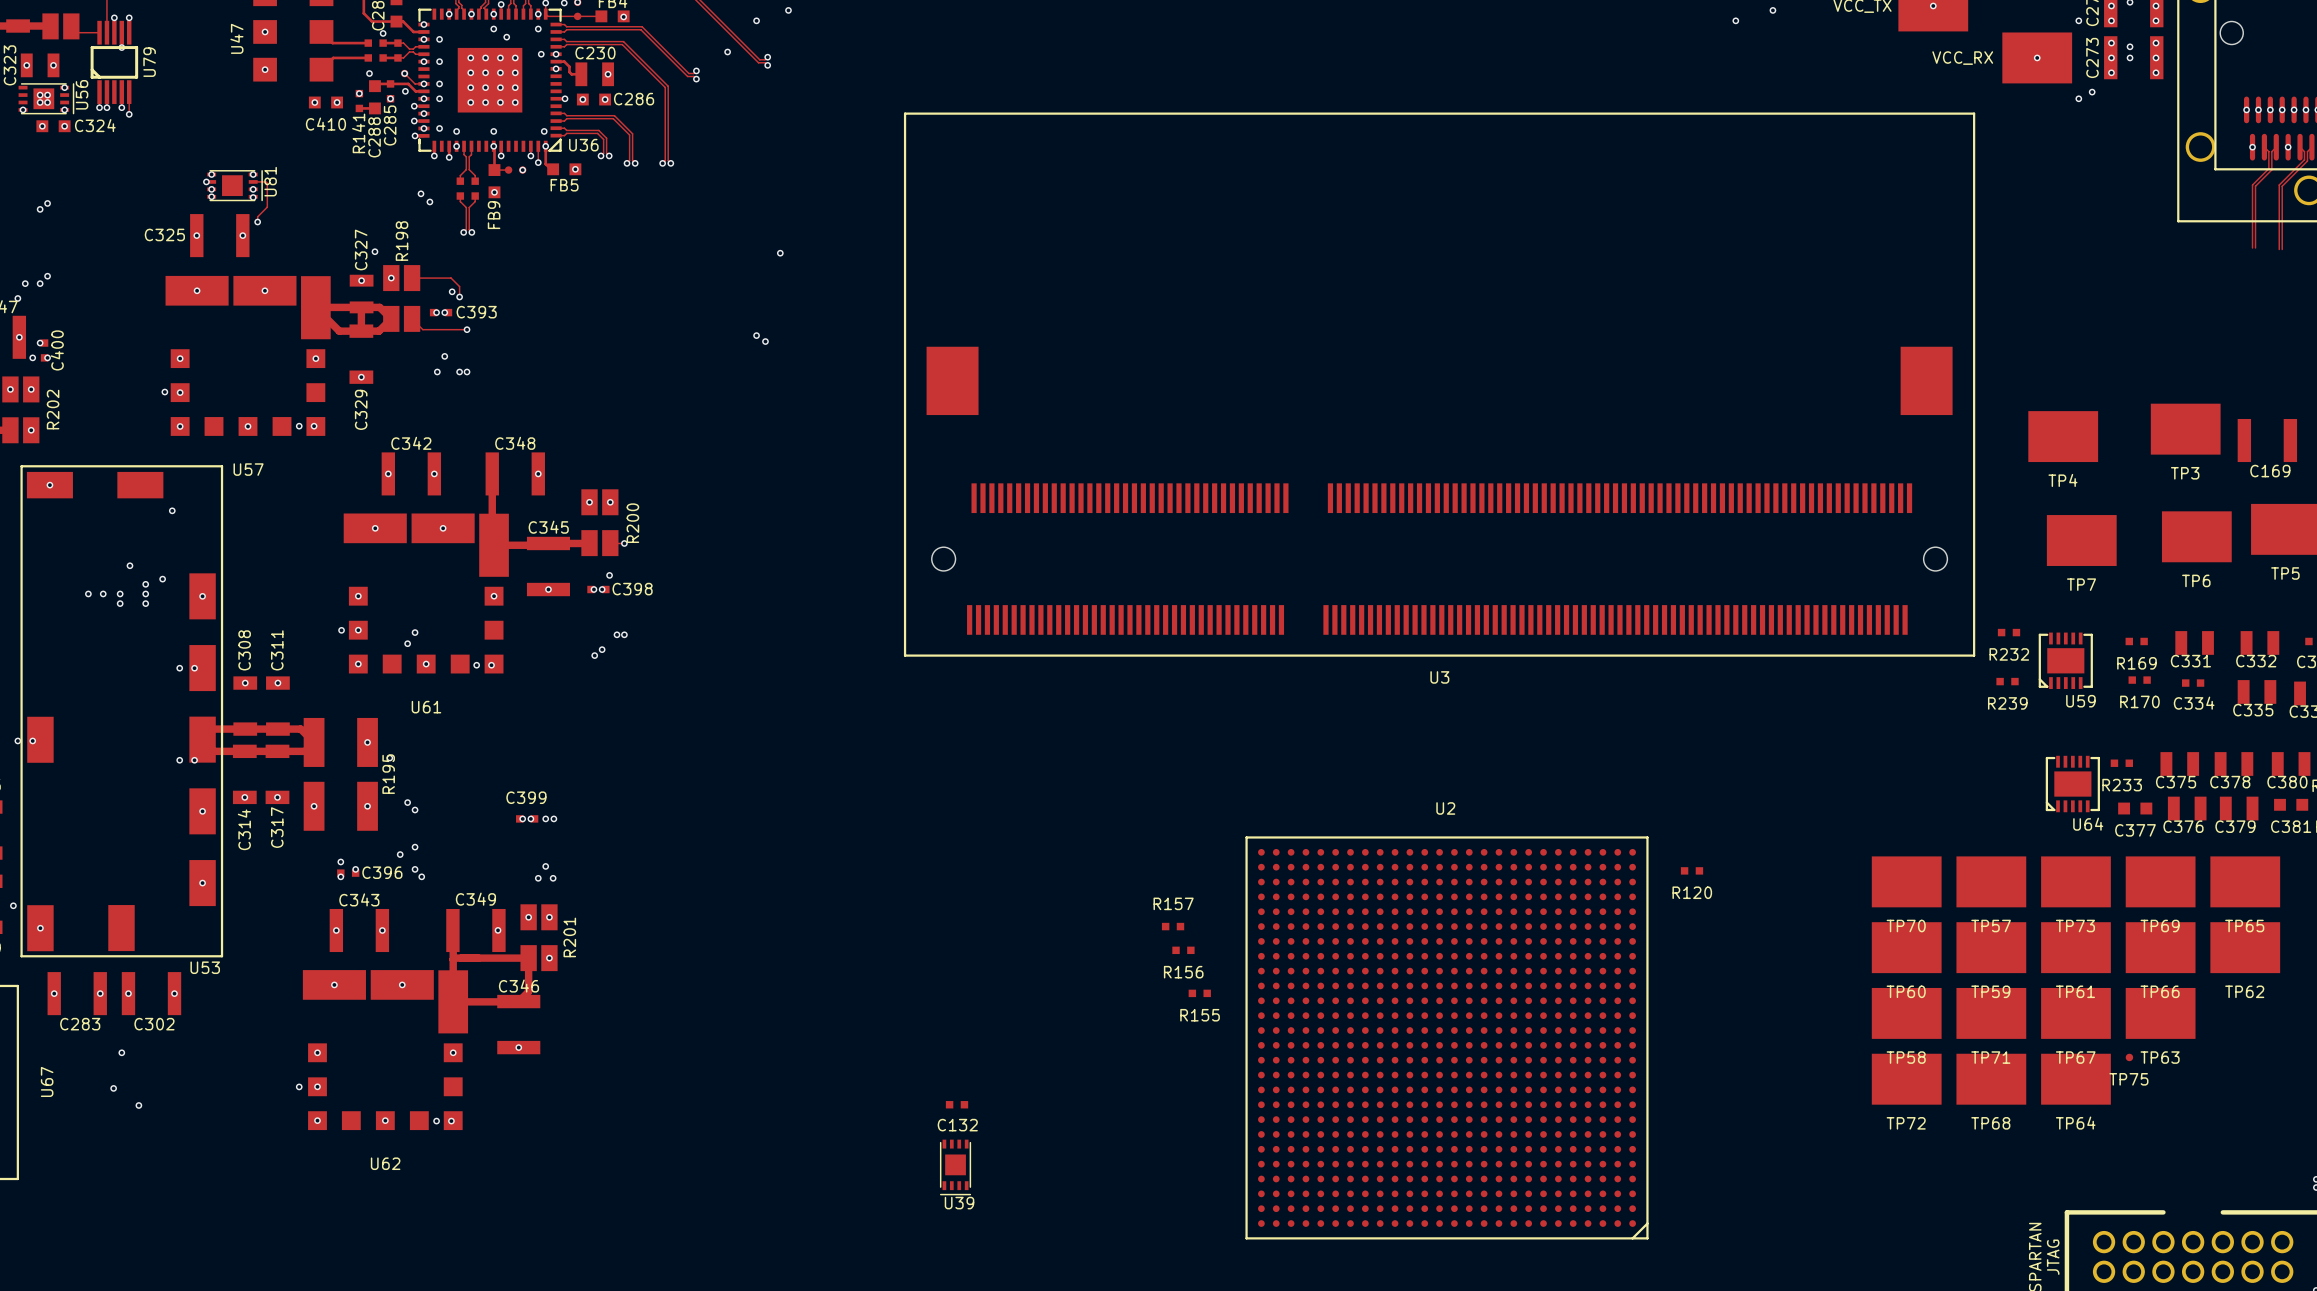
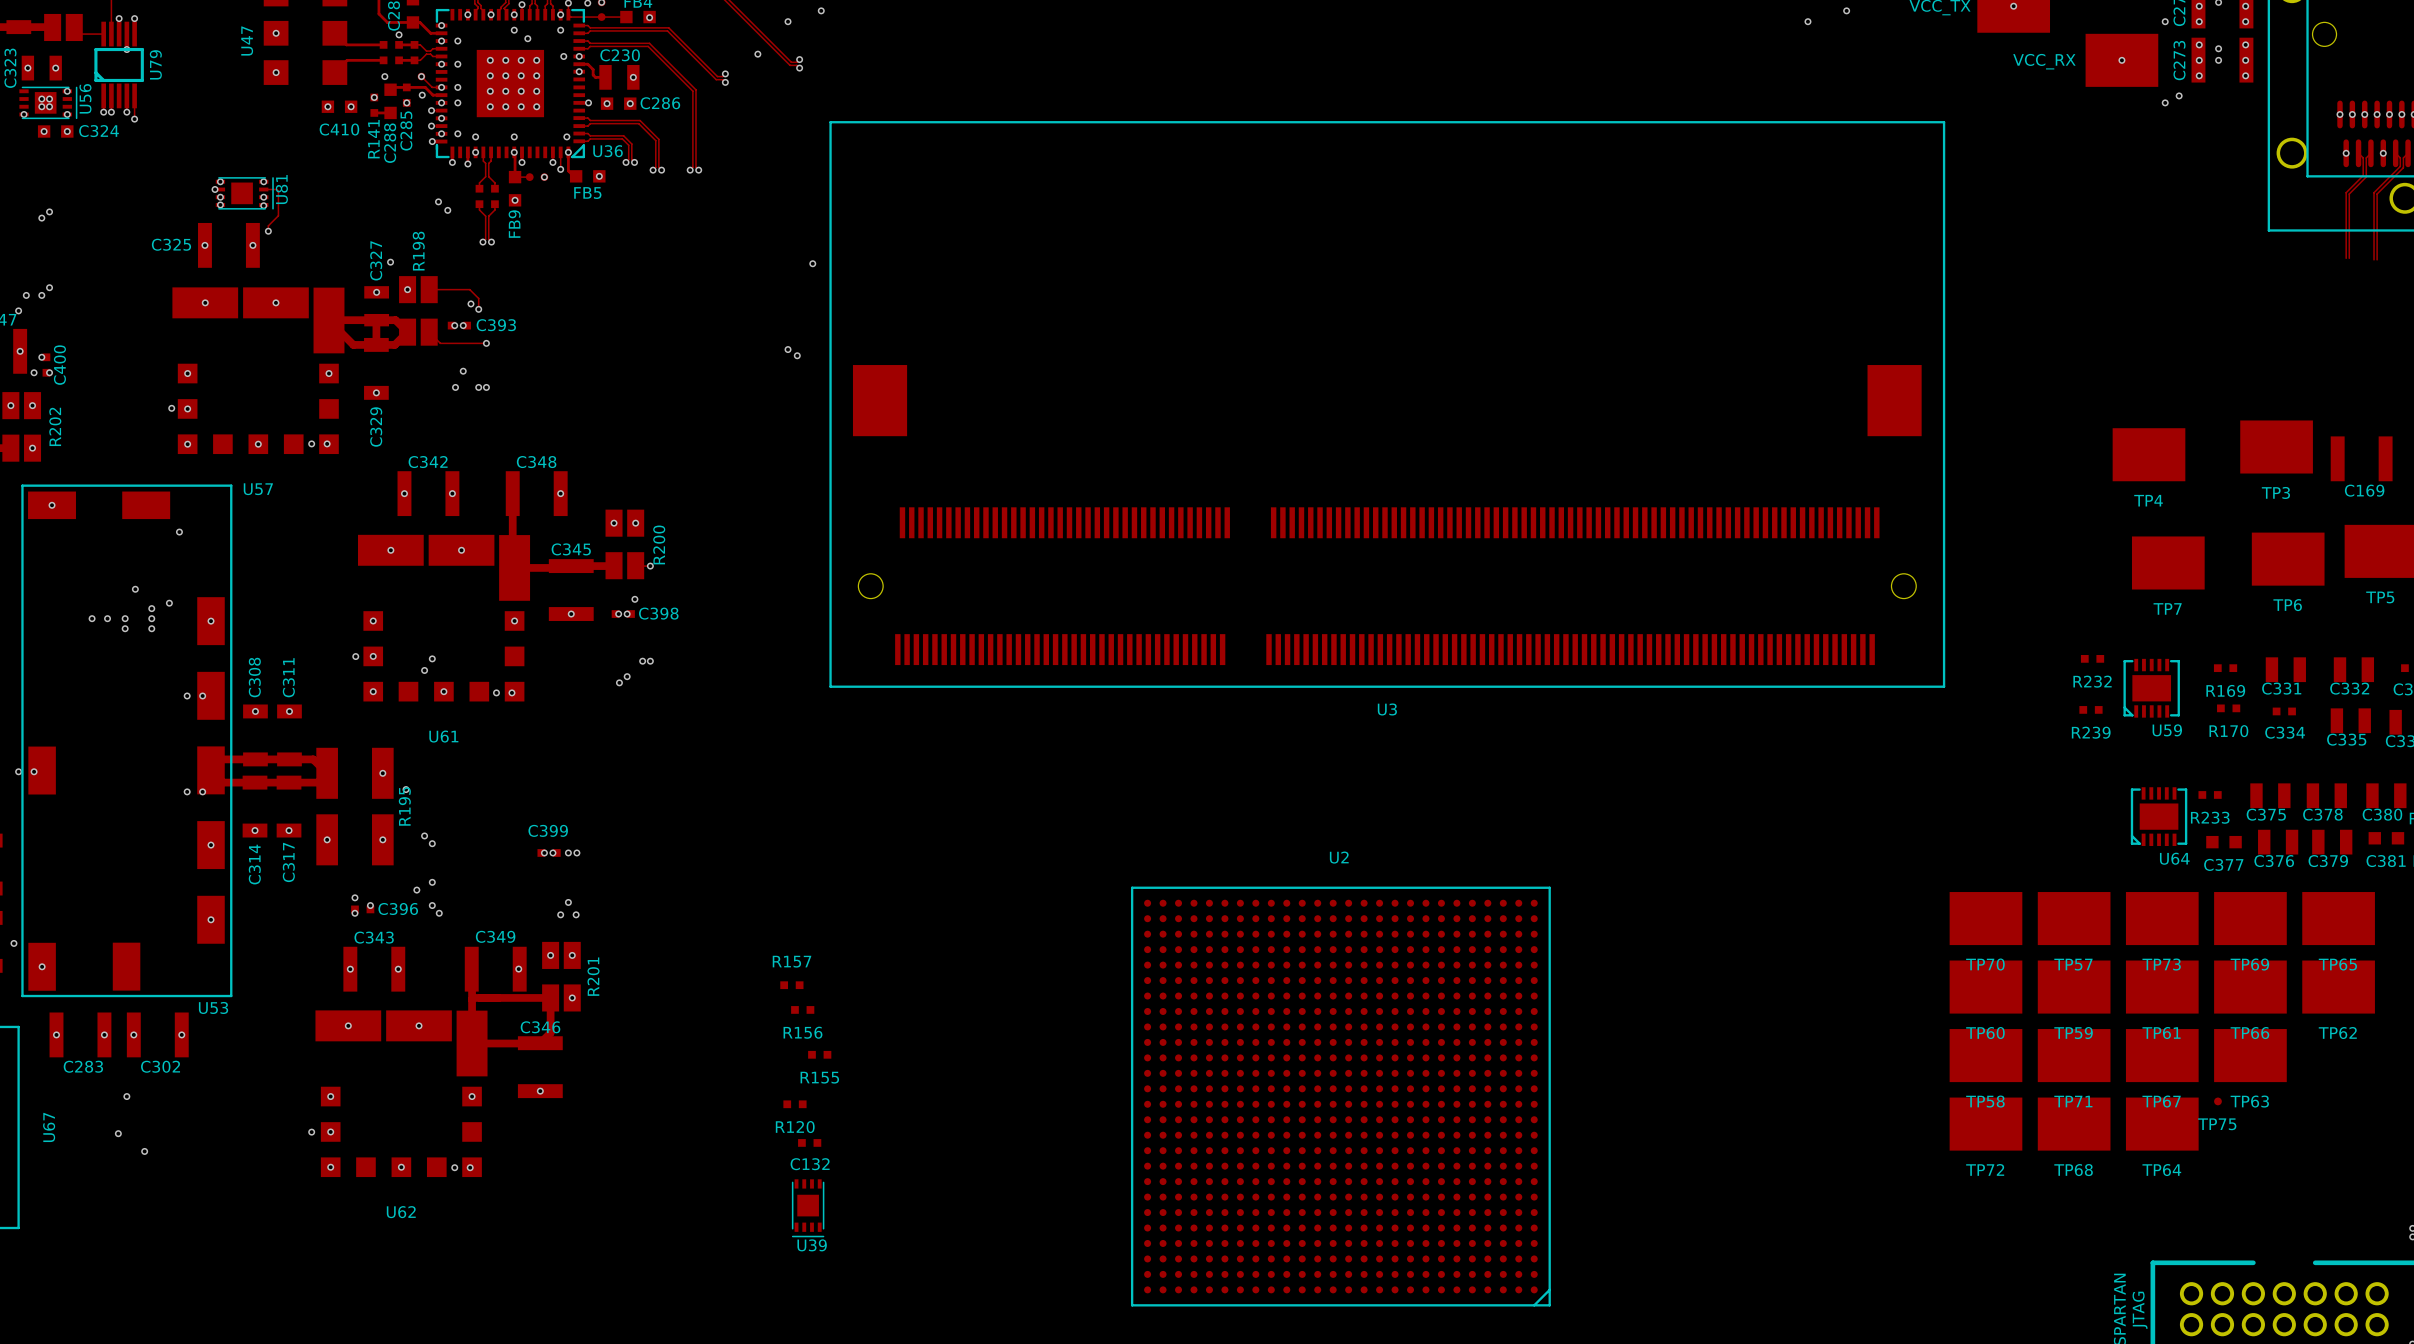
U3 position: (1439, 384) -> (1387, 404)
R120 position: (1692, 870) -> (794, 1104)
R157 position: (1173, 926) -> (791, 985)
R156 position: (1183, 950) -> (802, 1009)
R155 position: (1199, 993) -> (819, 1054)
U2 position: (1447, 1037) -> (1340, 1096)
C132 position: (957, 1104) -> (809, 1142)
U39 position: (955, 1167) -> (808, 1208)

